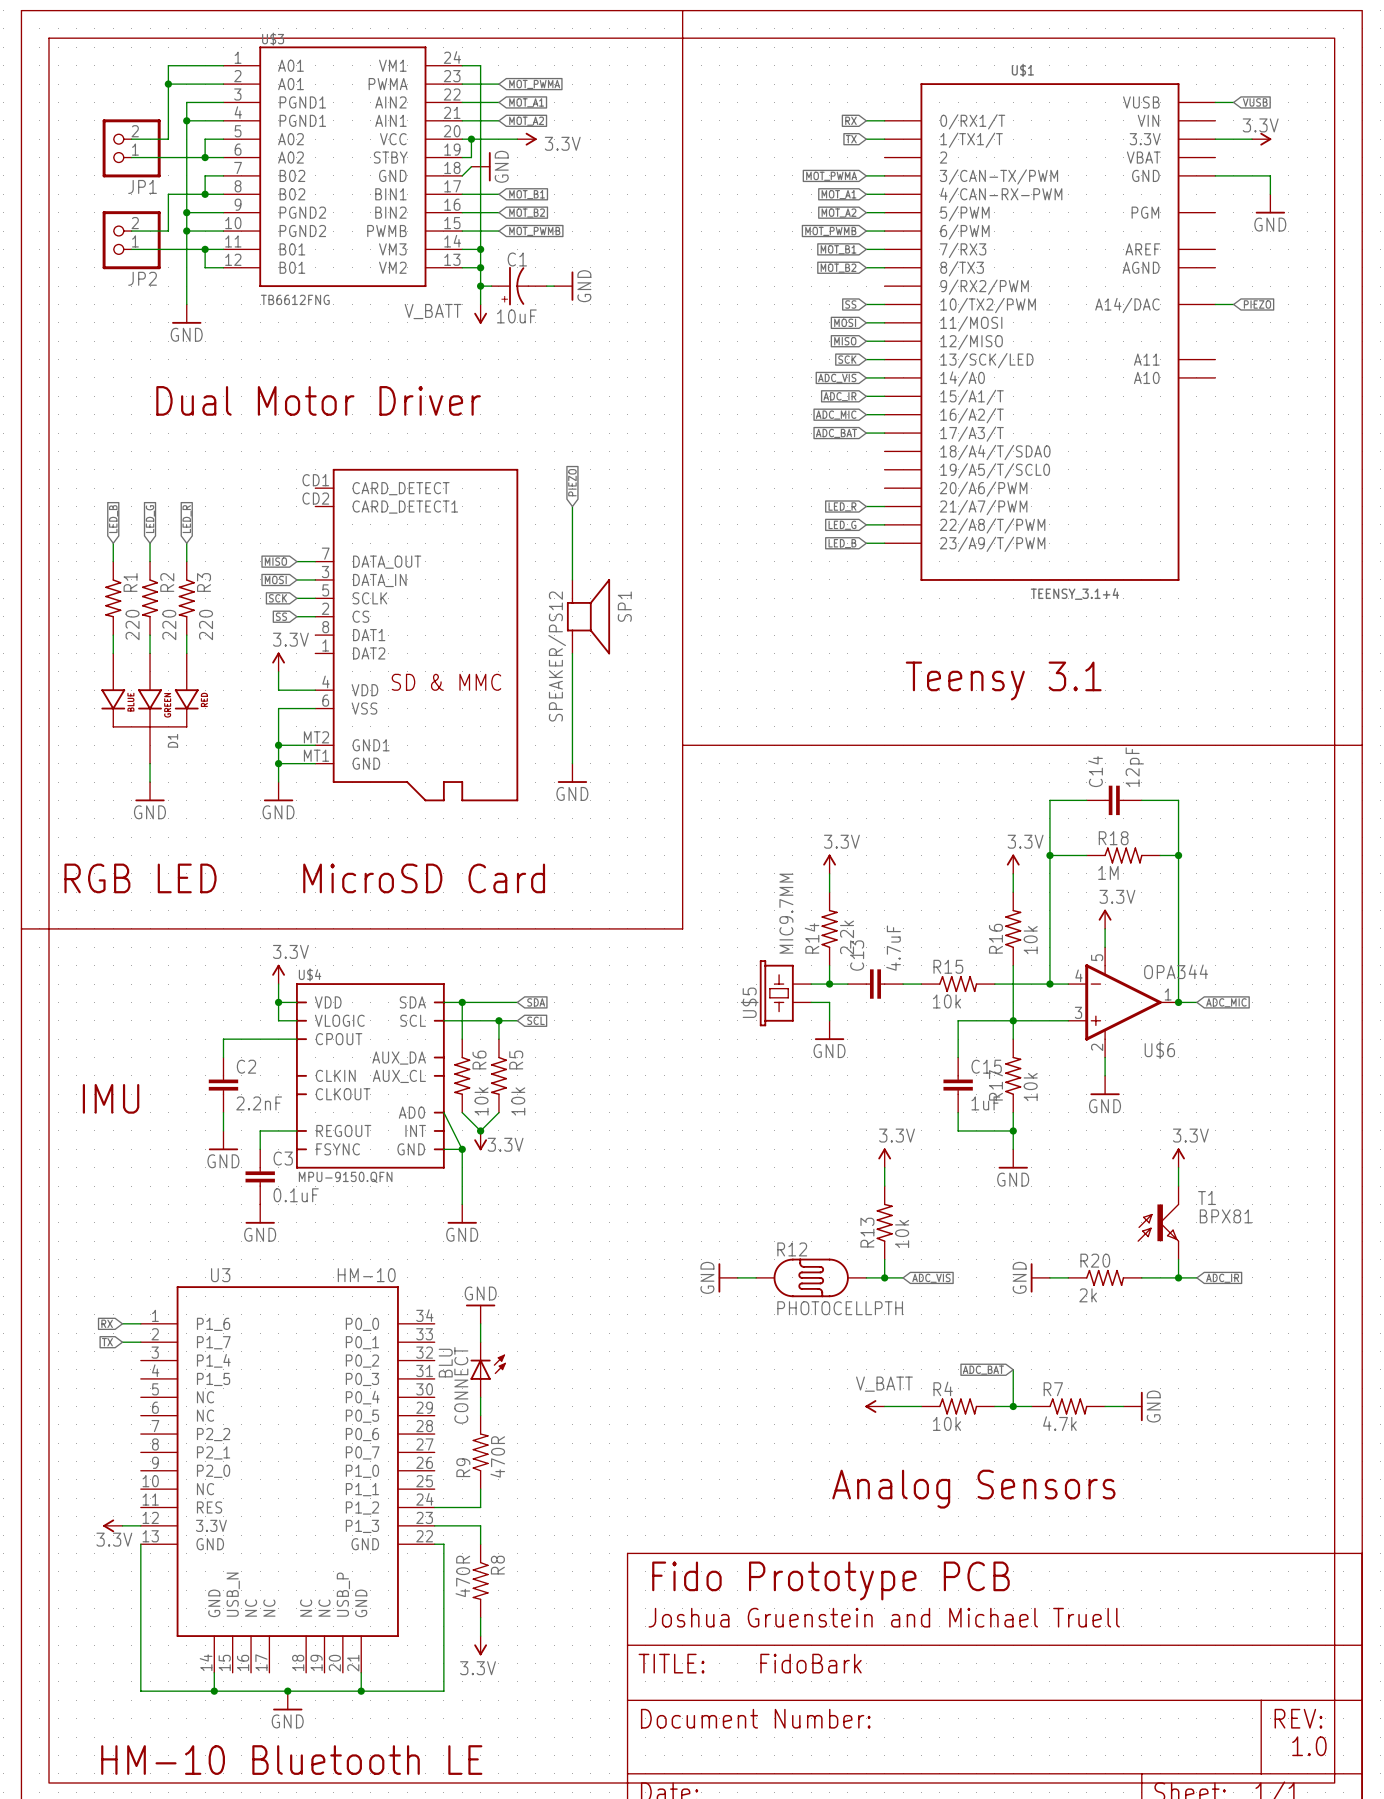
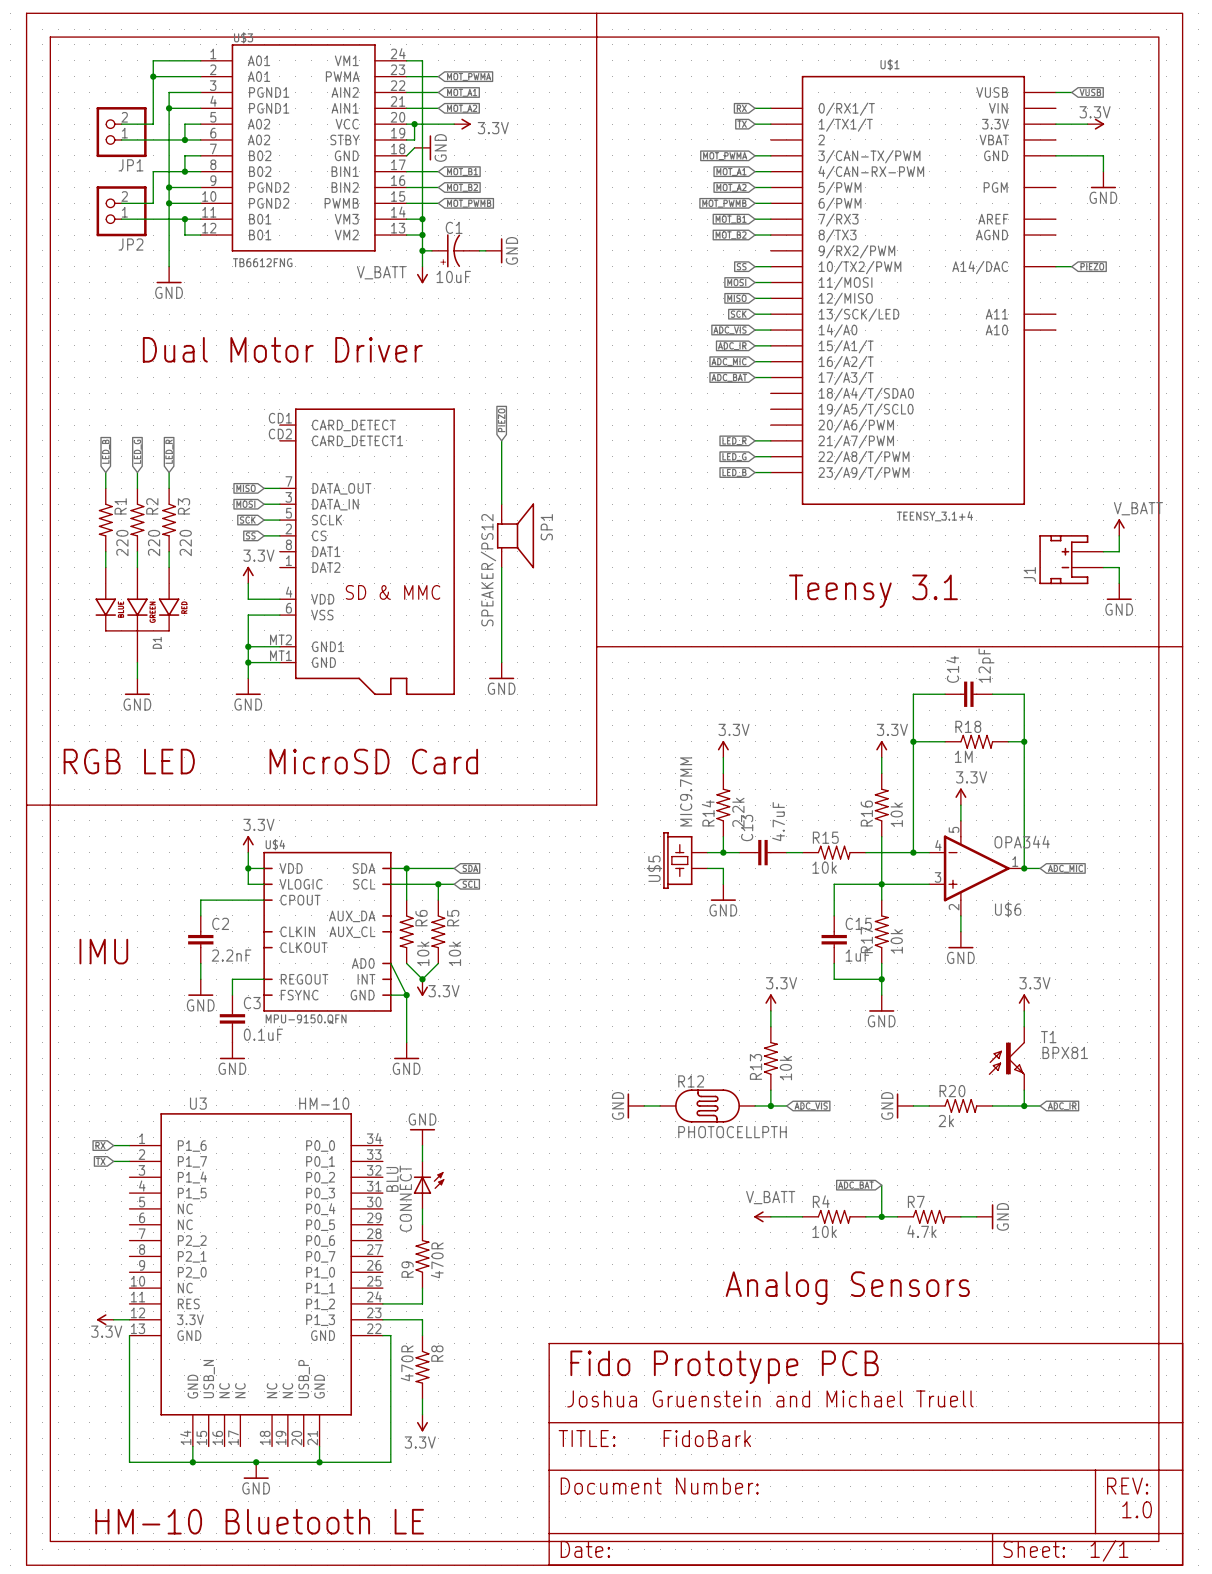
power symbol: none -> V_BATT (1119, 527)
wire: none -> (1119, 535) (1119, 551) (1103, 551)
J1: none -> (1071, 559)
wire: none -> (1103, 567) (1119, 567) (1119, 583)
power symbol: none -> GND (1119, 591)

